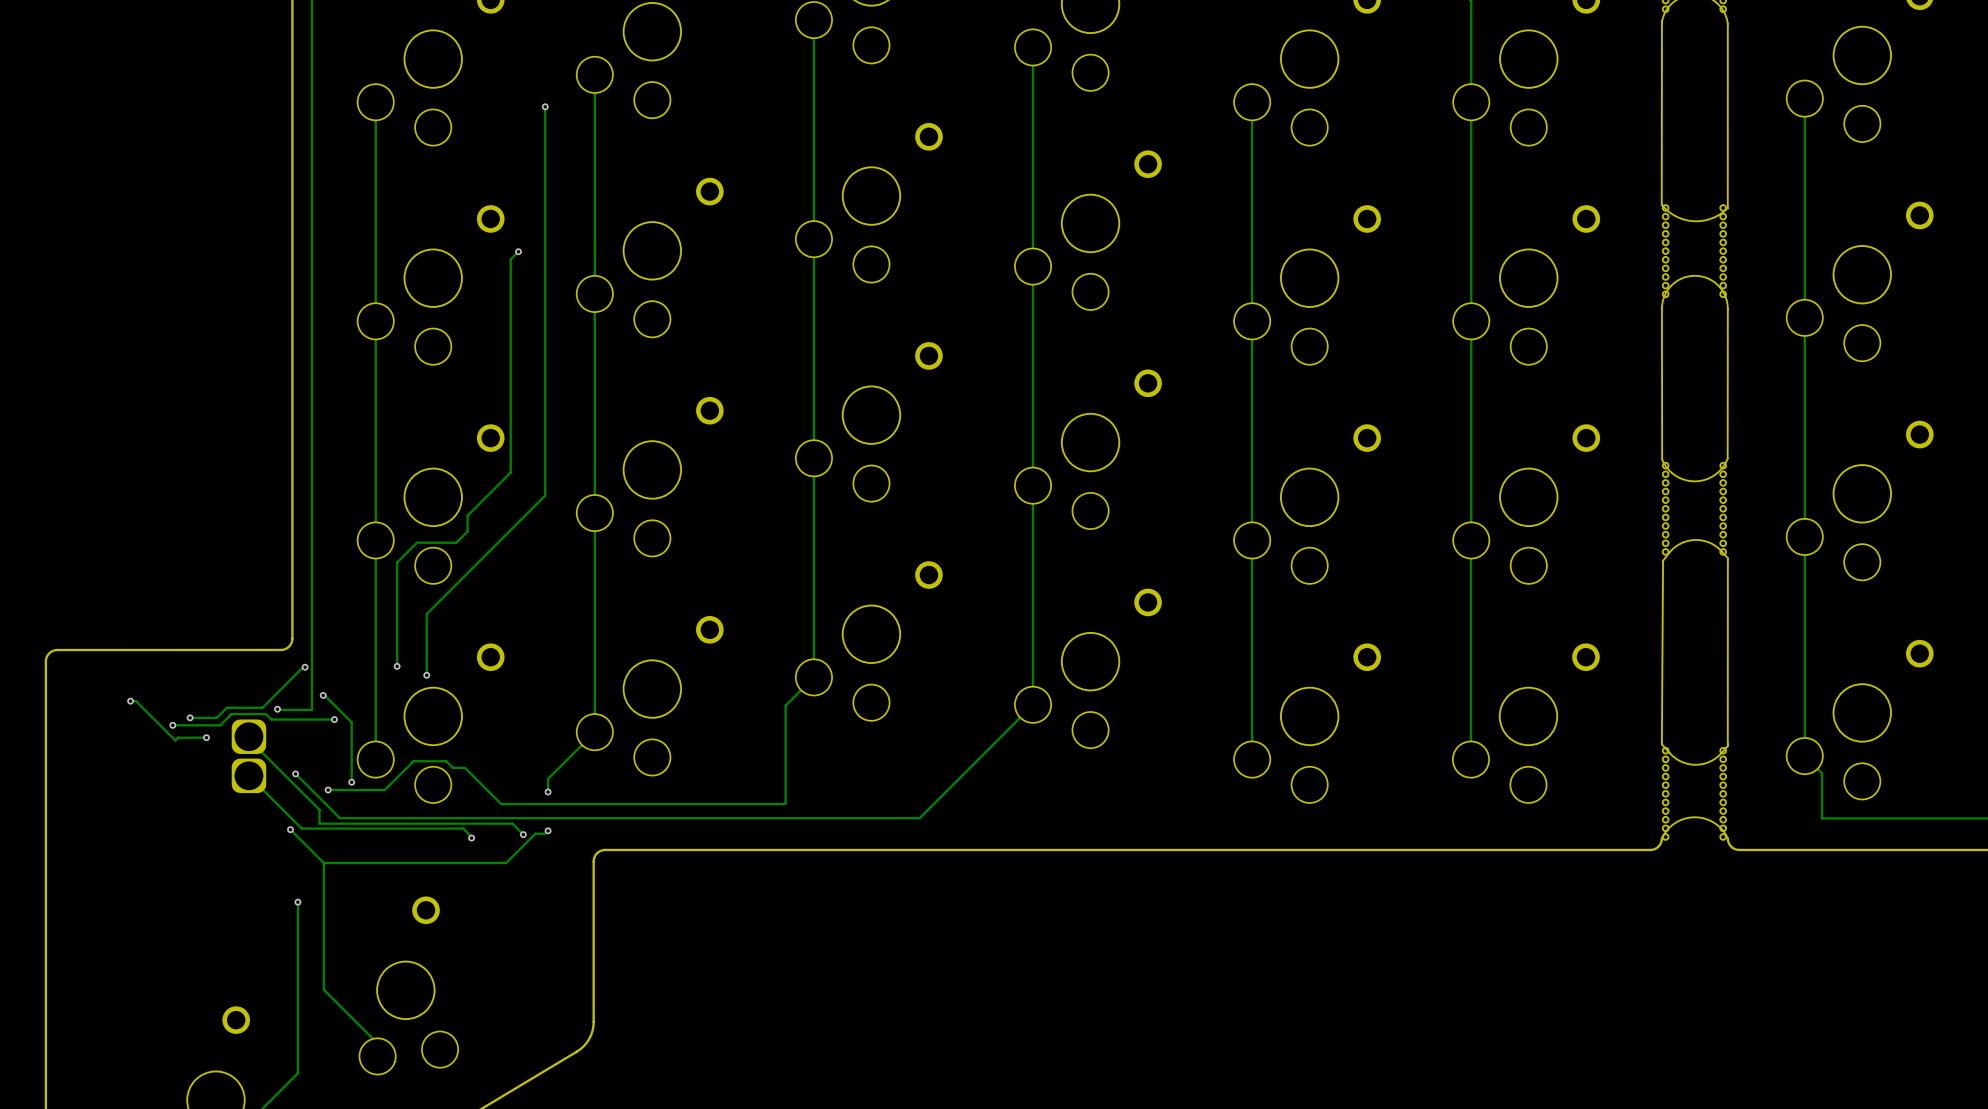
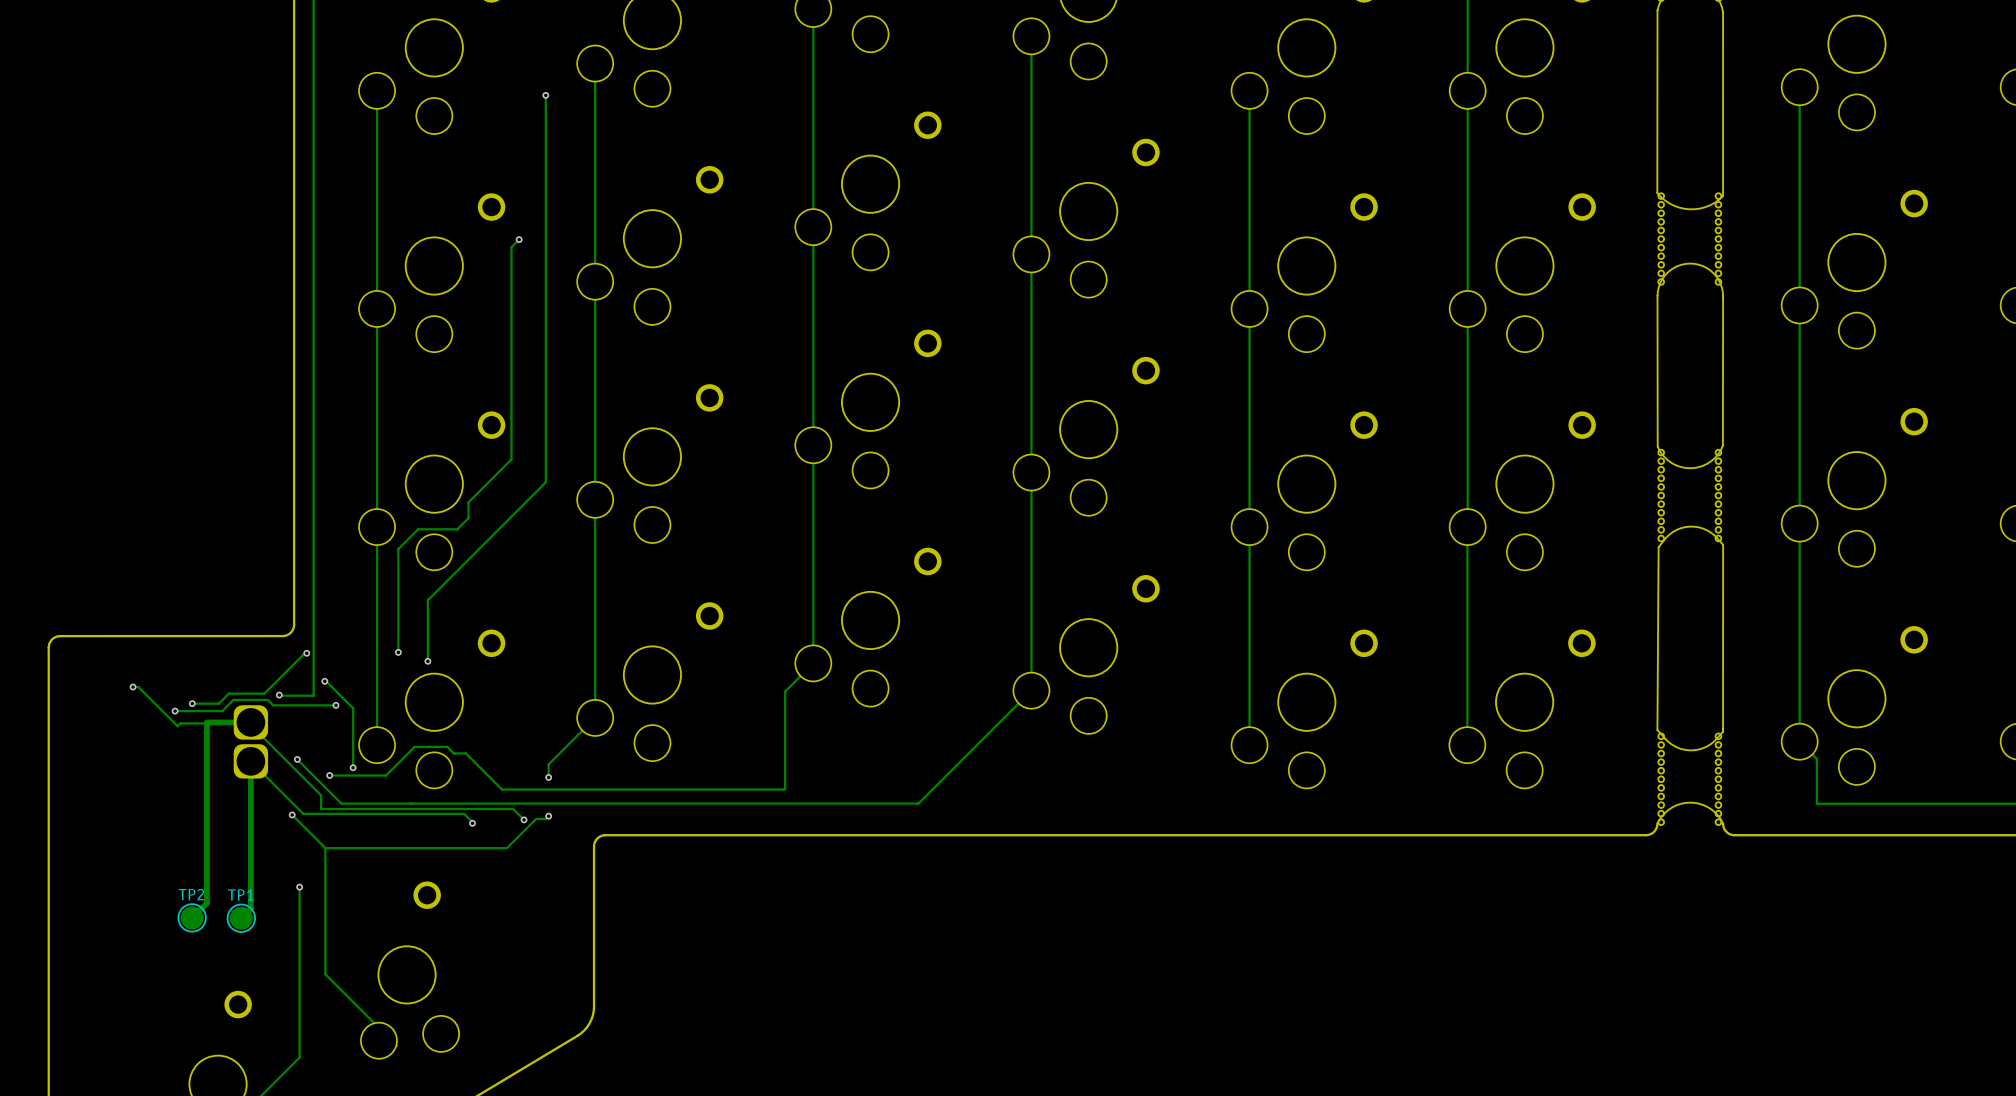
track: none -> (250, 722) (207, 722)
track: none -> (206, 722) (206, 903) (192, 917)
via: (206, 737) -> none
track: none -> (250, 761) (250, 908) (241, 918)
TP2: none -> (192, 917)
TP1: none -> (241, 918)

